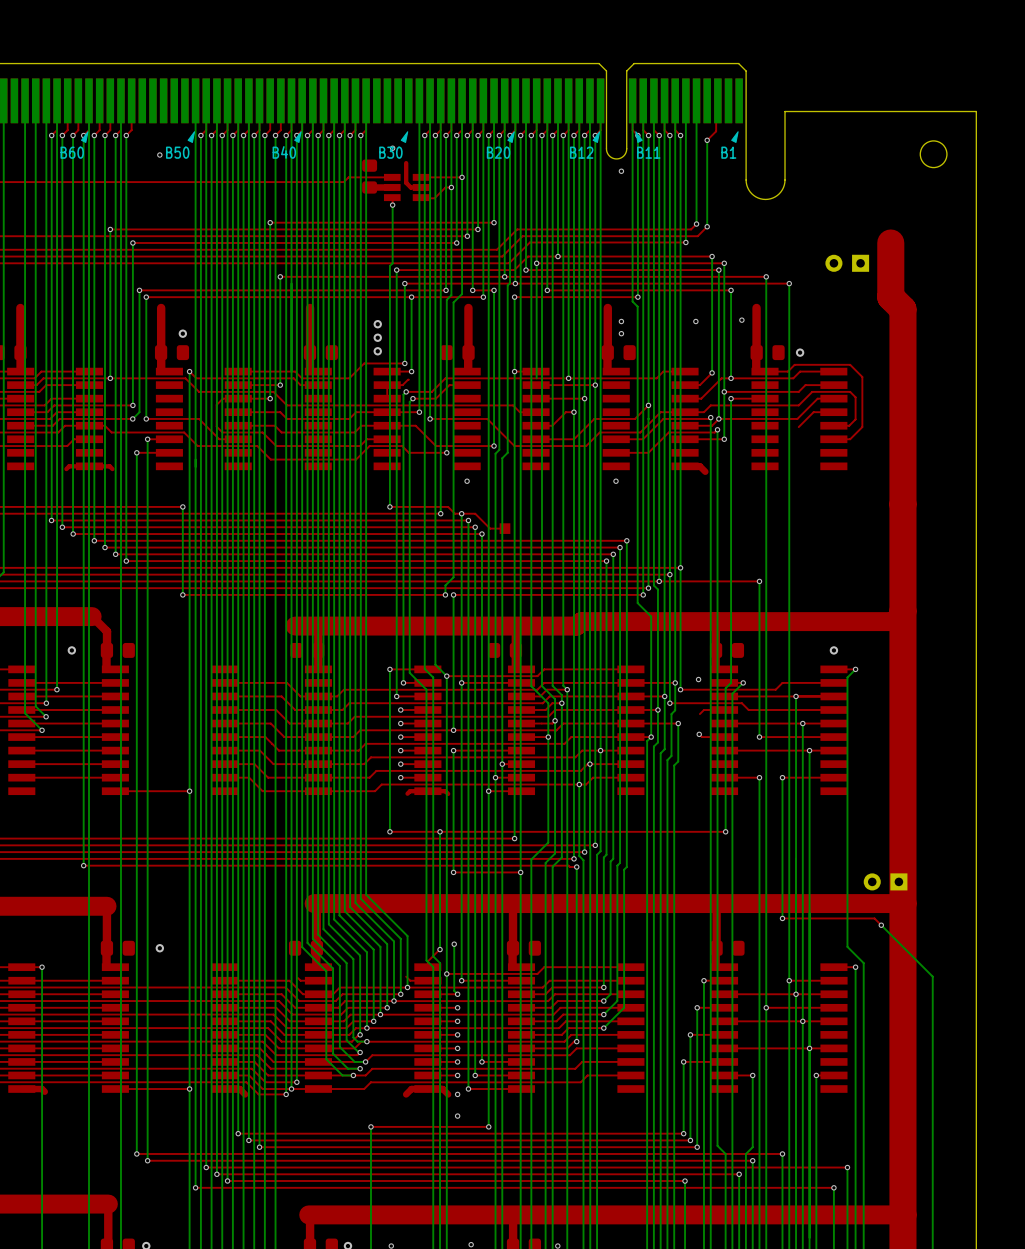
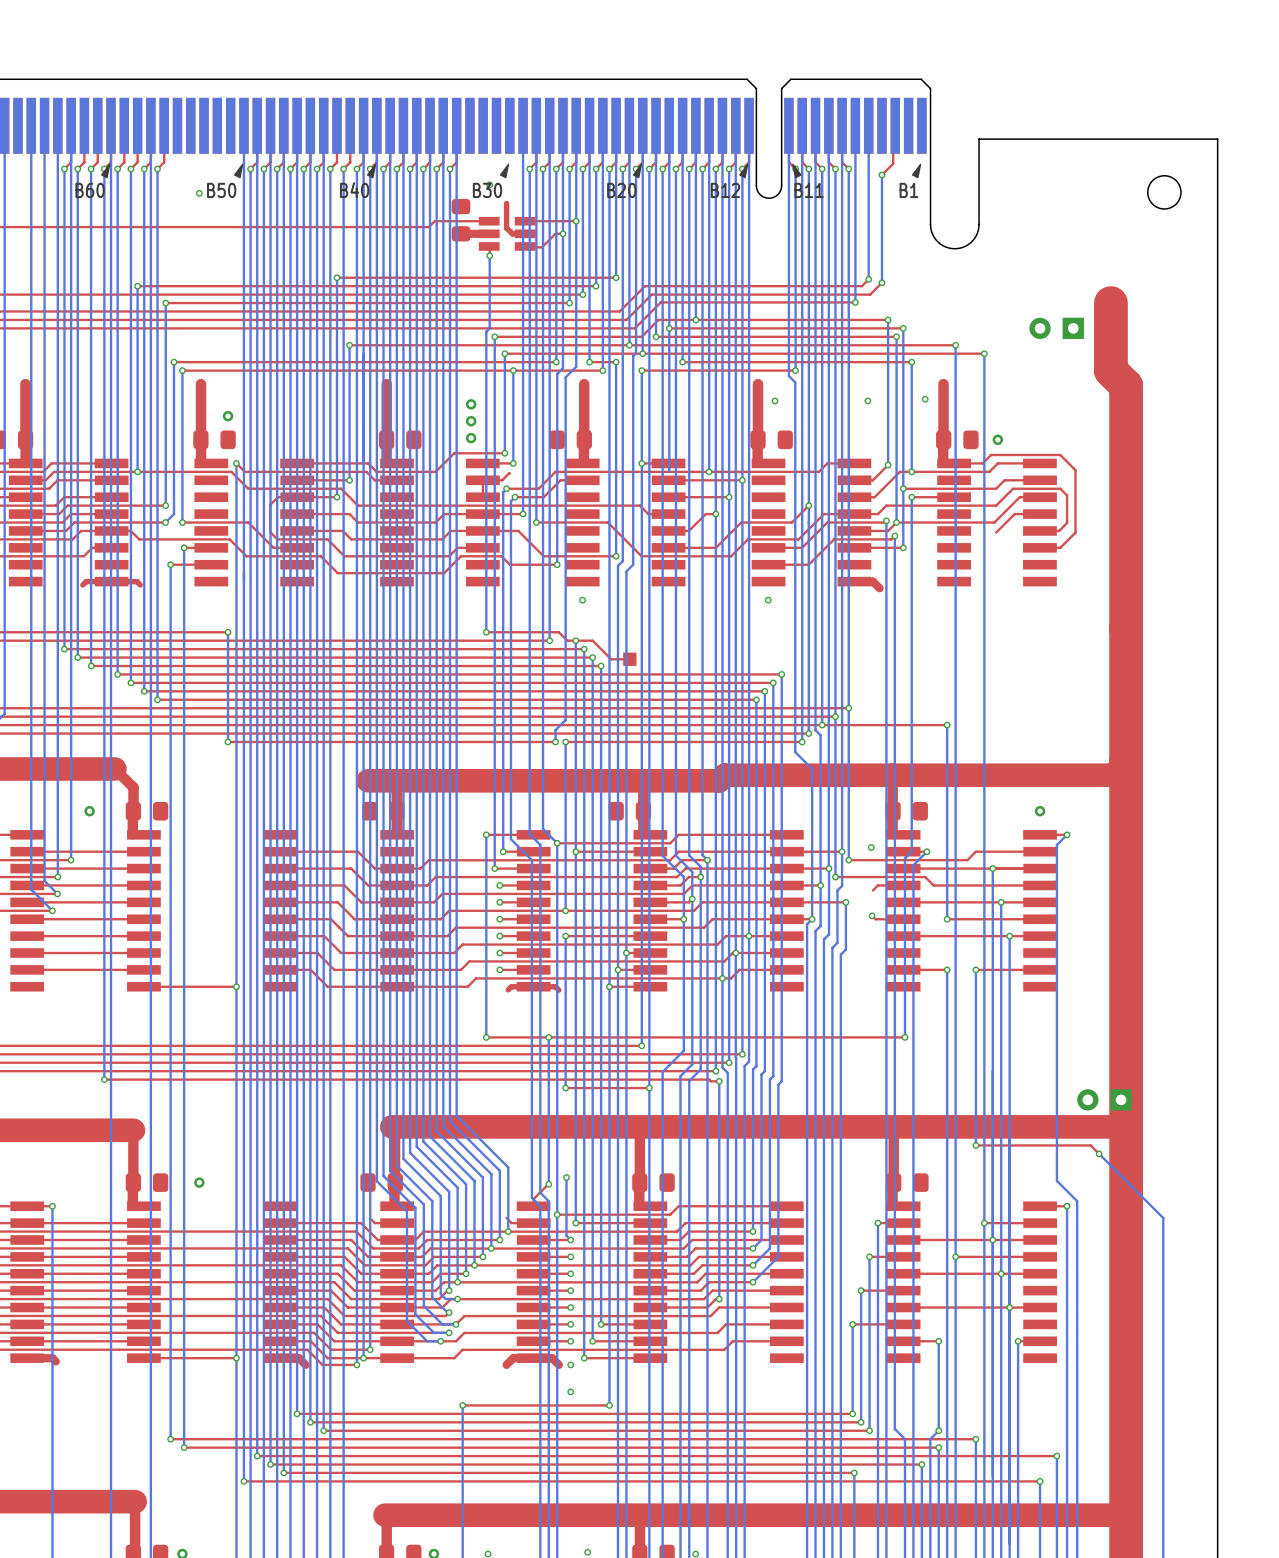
via: (621, 171) -> none
via: (621, 333) -> none
via: none -> (938, 1430)

